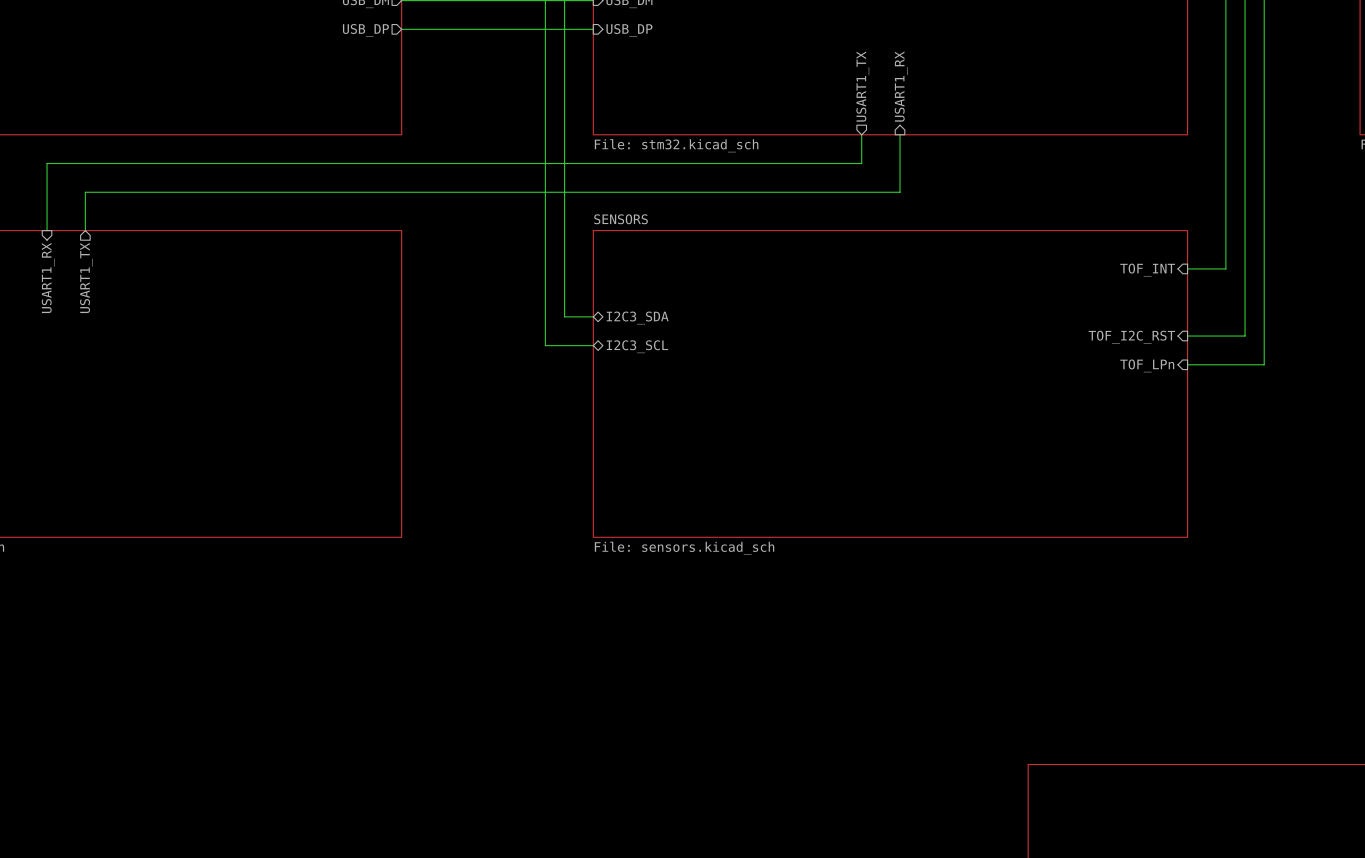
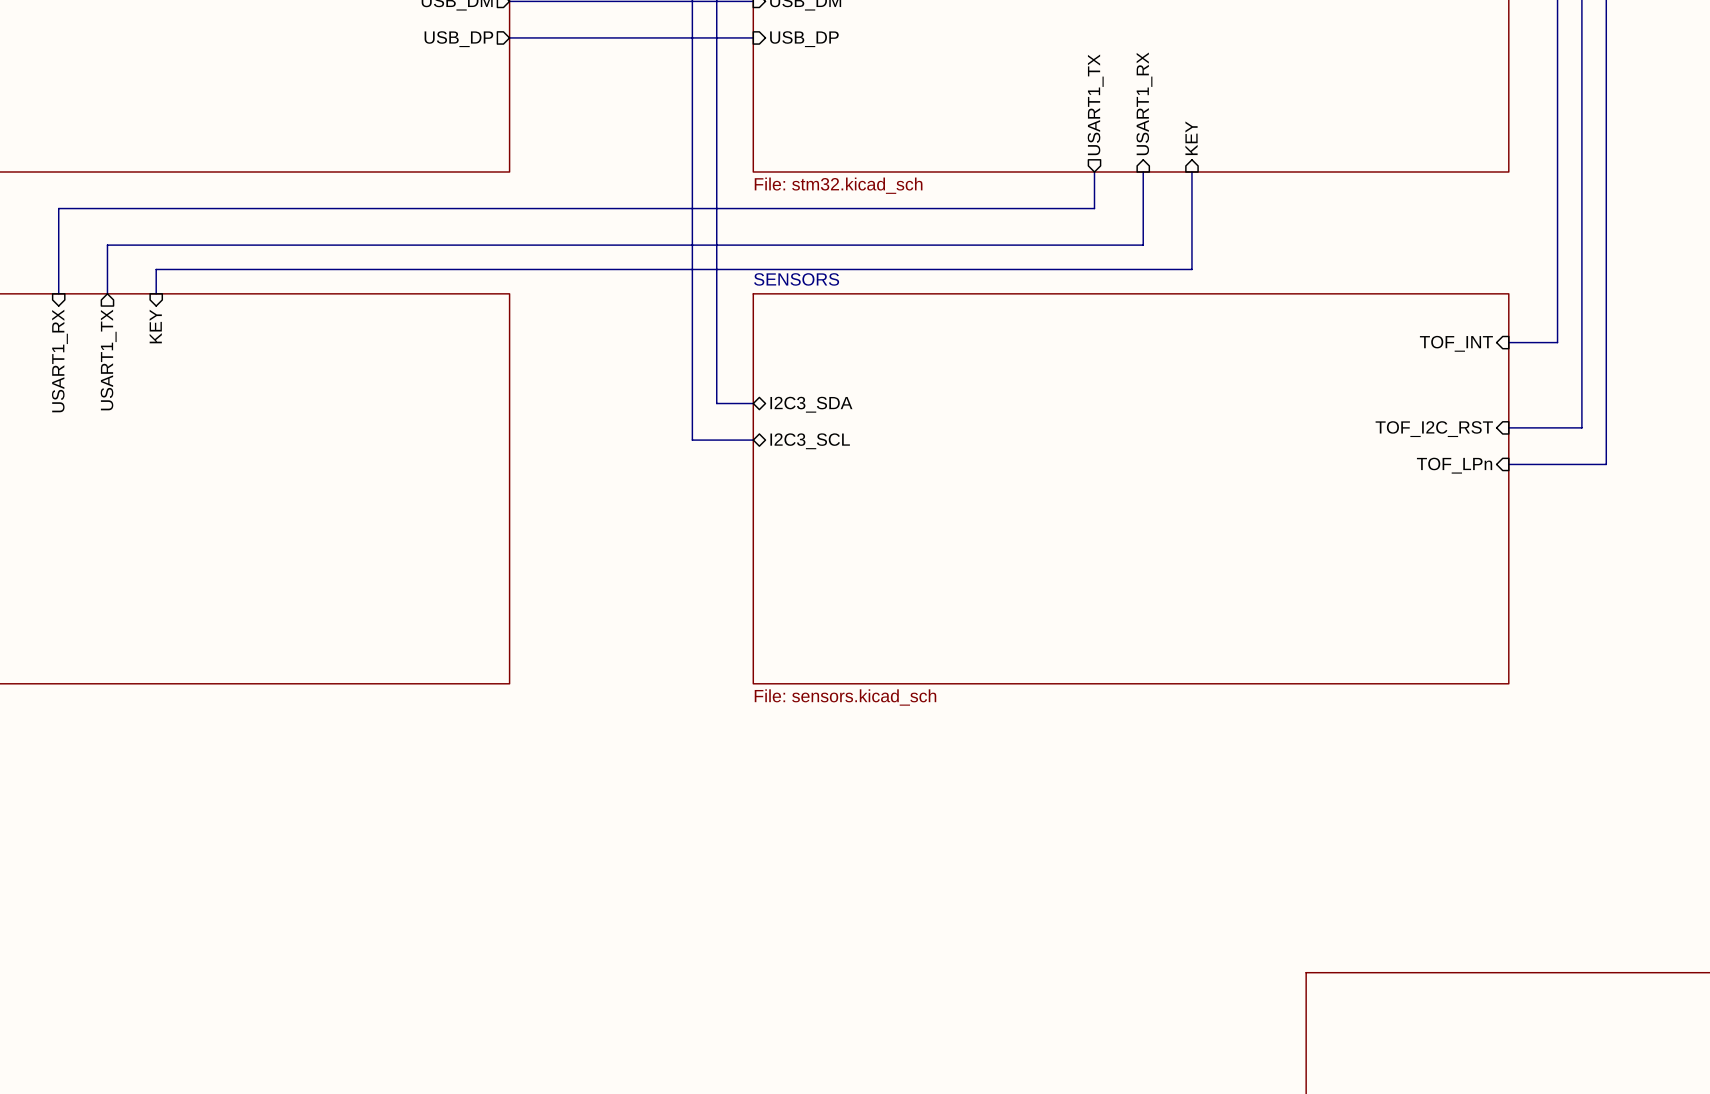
sheet pin: none -> KEY (1191, 138)
wire: none -> (1191, 171) (1191, 269) (156, 269) (156, 293)
sheet pin: none -> KEY (155, 326)

